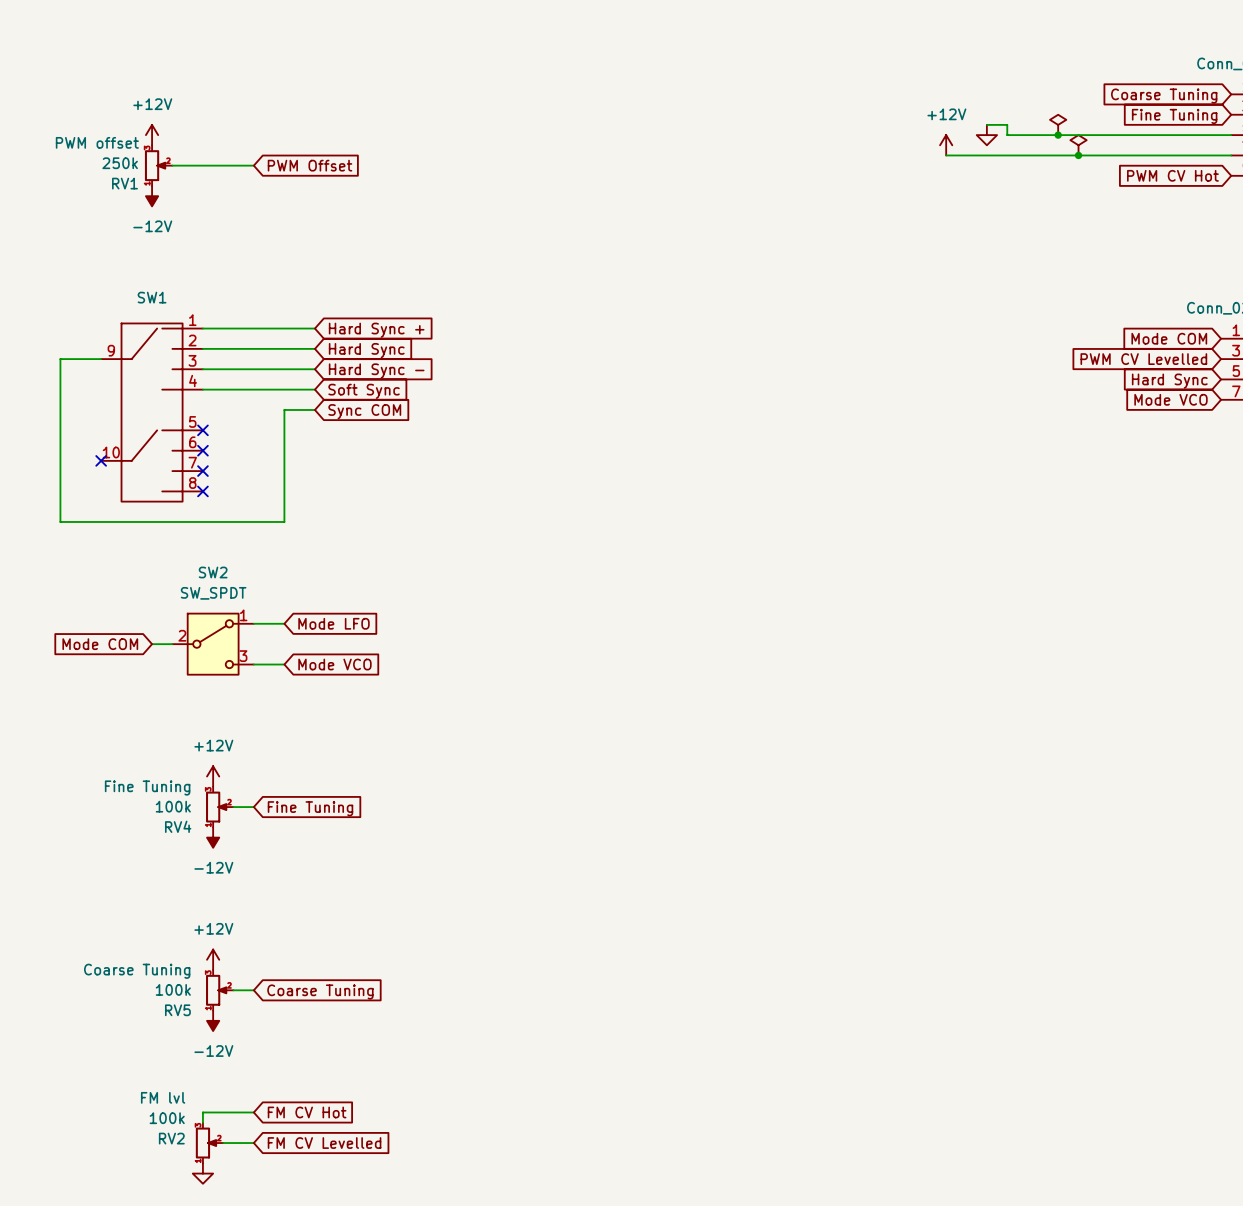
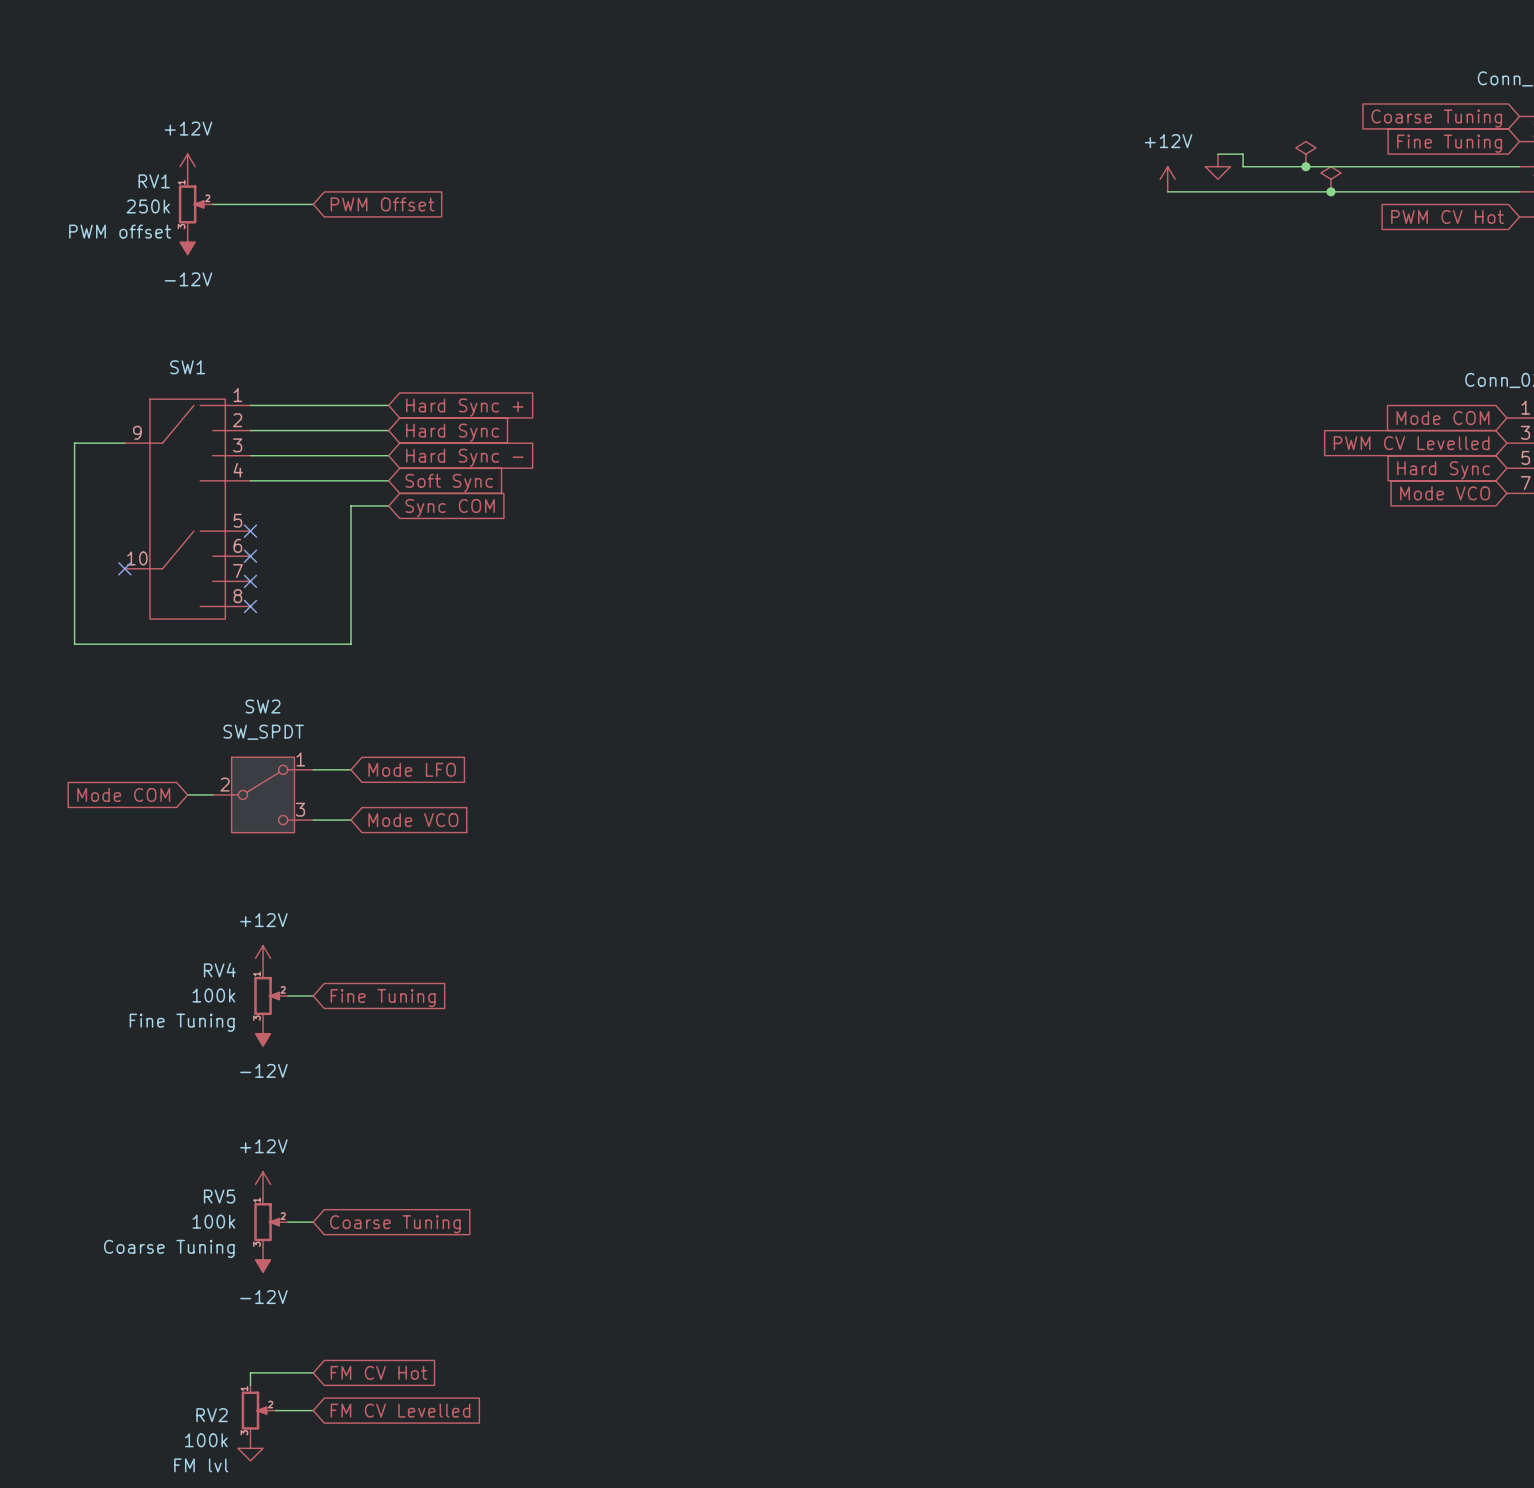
RV1 flip: as is (155, 165) -> up-down (191, 204)
RV4 flip: as is (216, 807) -> up-down (266, 995)
RV5 flip: as is (216, 990) -> up-down (266, 1222)
RV2 flip: as is (206, 1143) -> up-down (254, 1410)

